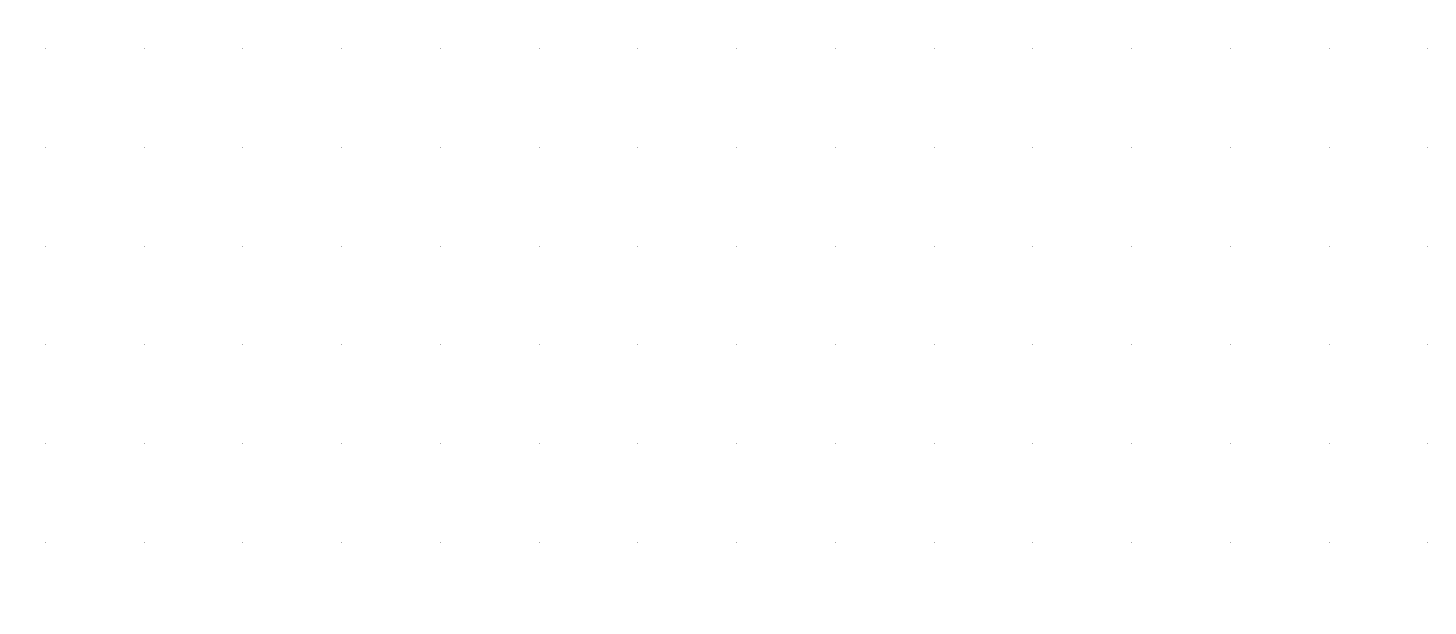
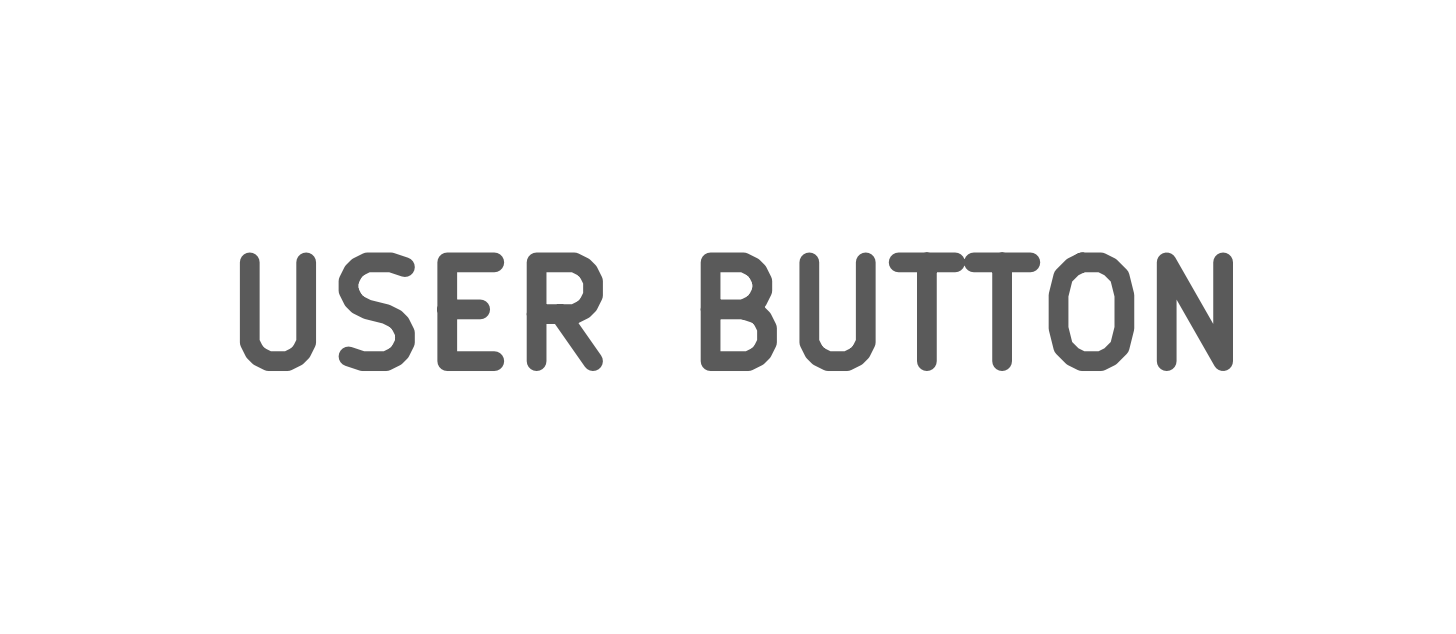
text: none -> USER BUTTON (736, 311)

